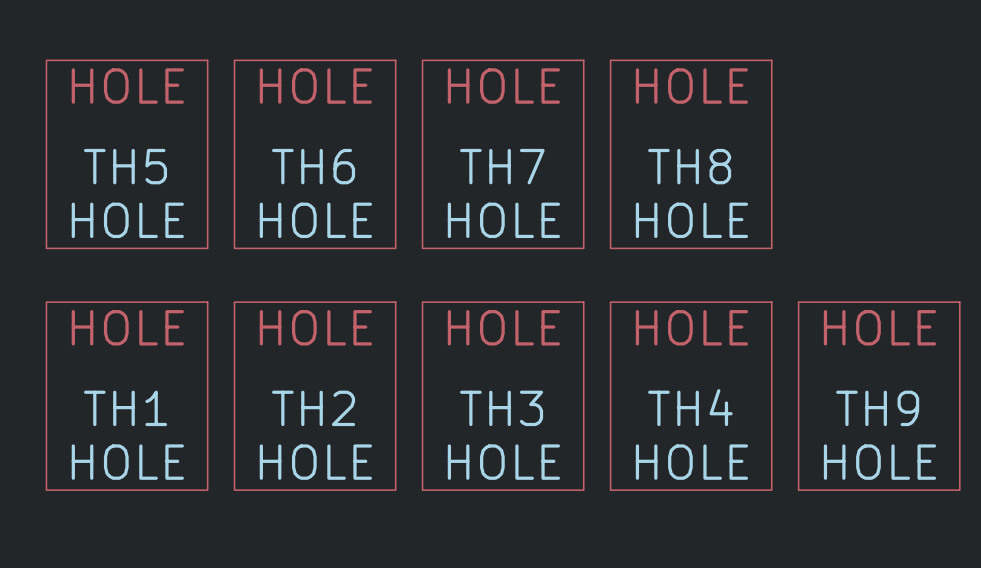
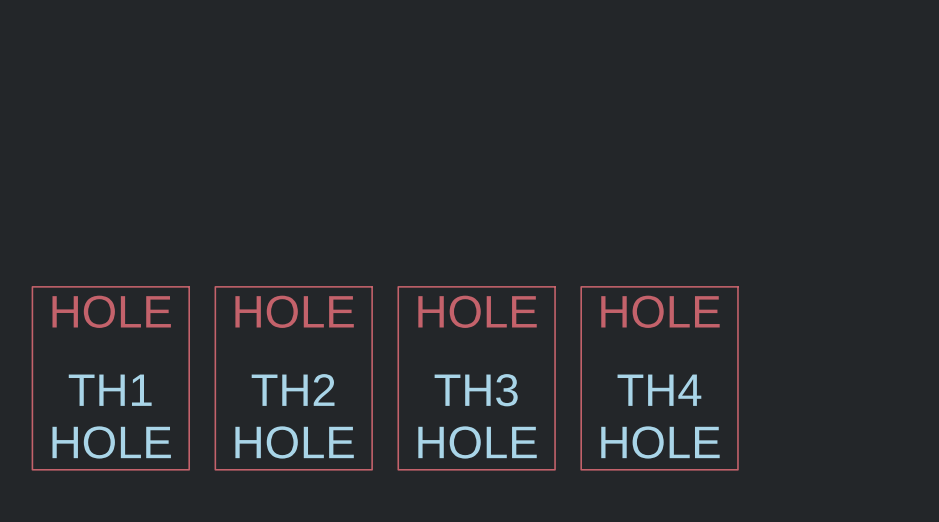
TH5: HOLE (127, 154) -> none
TH6: HOLE (315, 154) -> none
TH7: HOLE (503, 154) -> none
TH8: HOLE (691, 154) -> none
TH9: HOLE (879, 396) -> none

